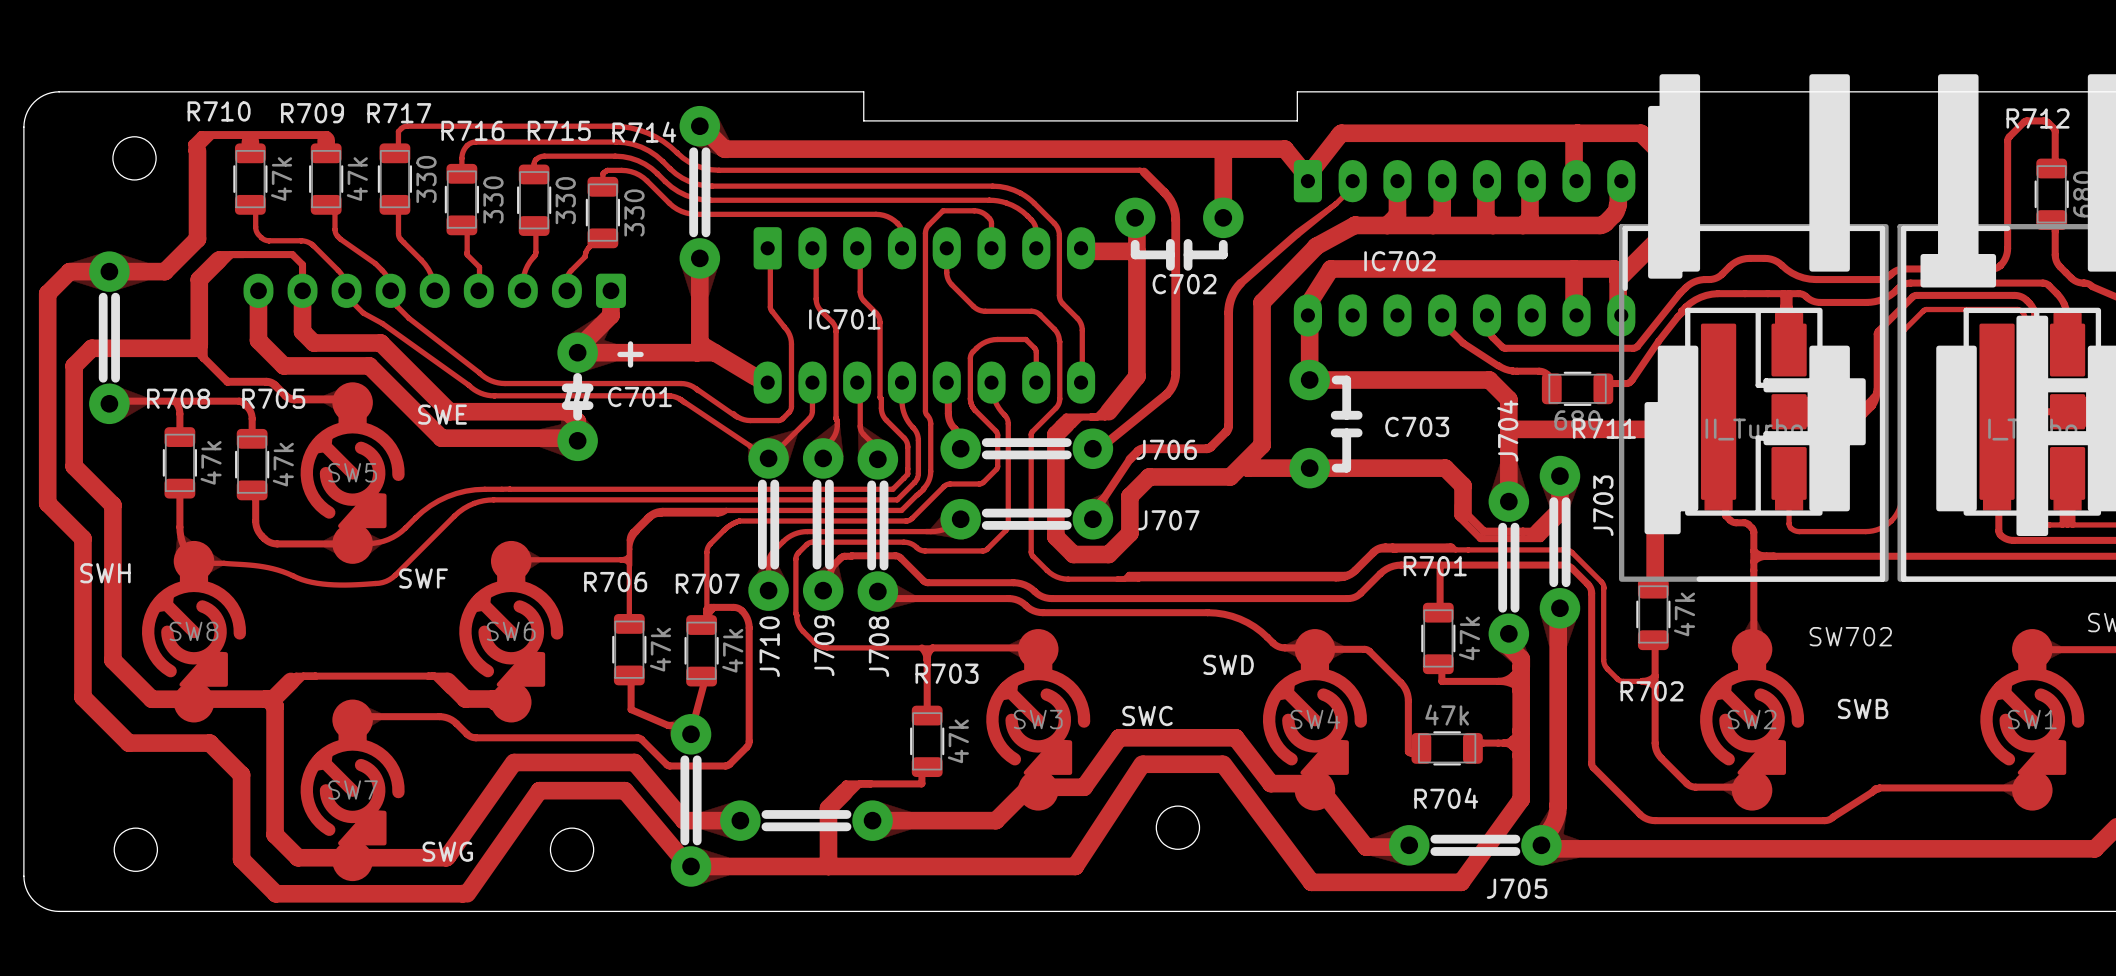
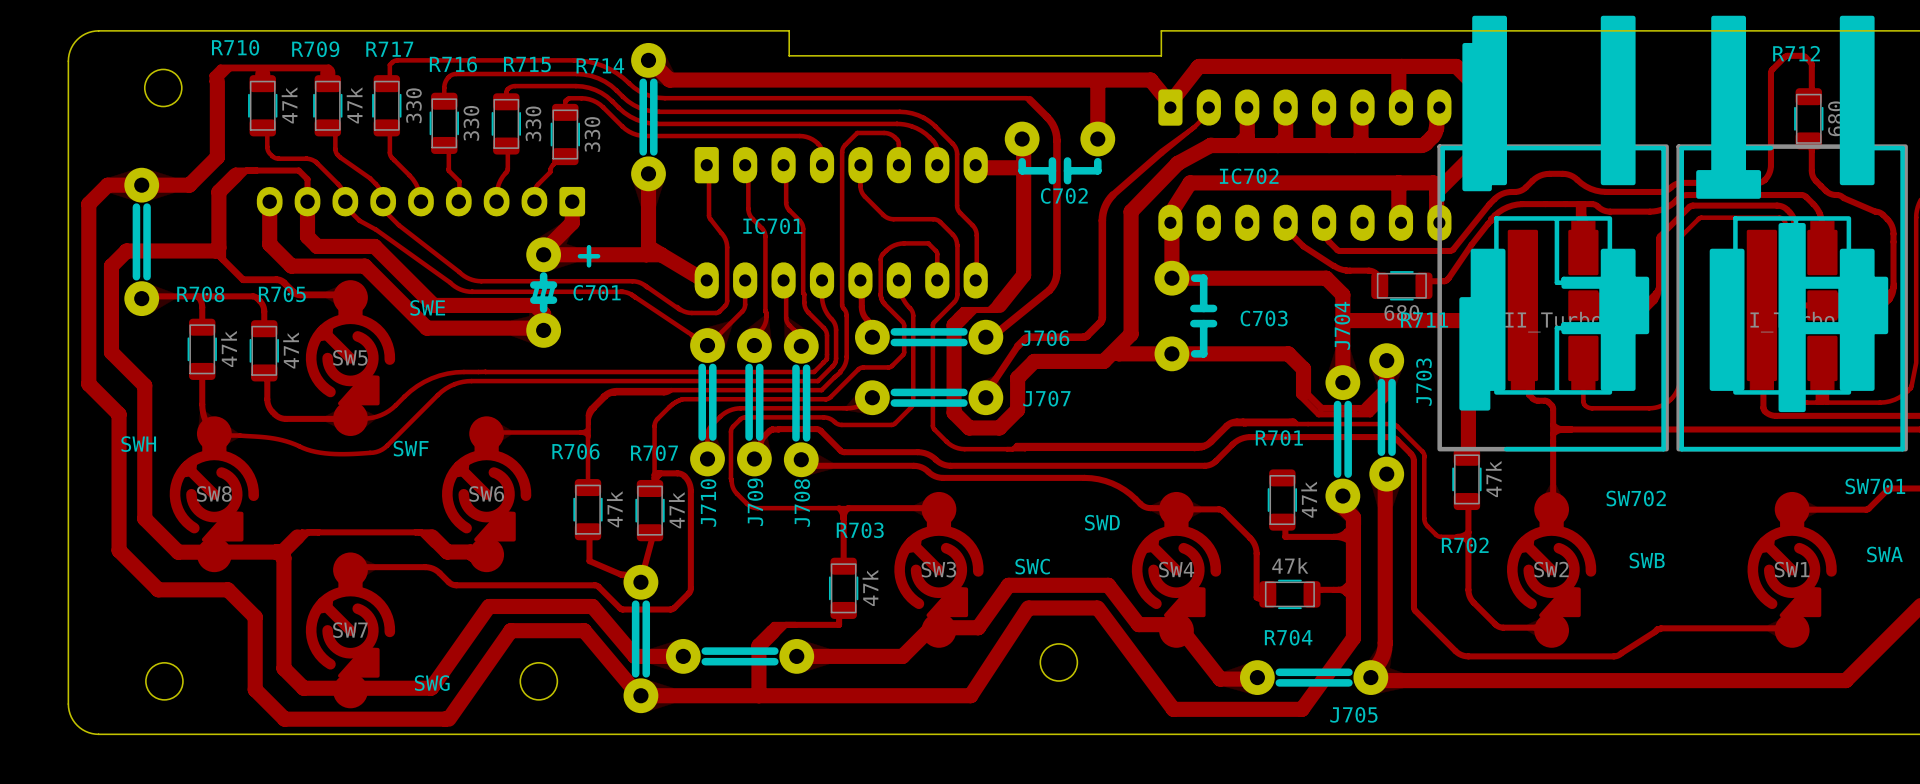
top track: (1440, 565) (1440, 605) (1442, 607) (1438, 612) -> none

